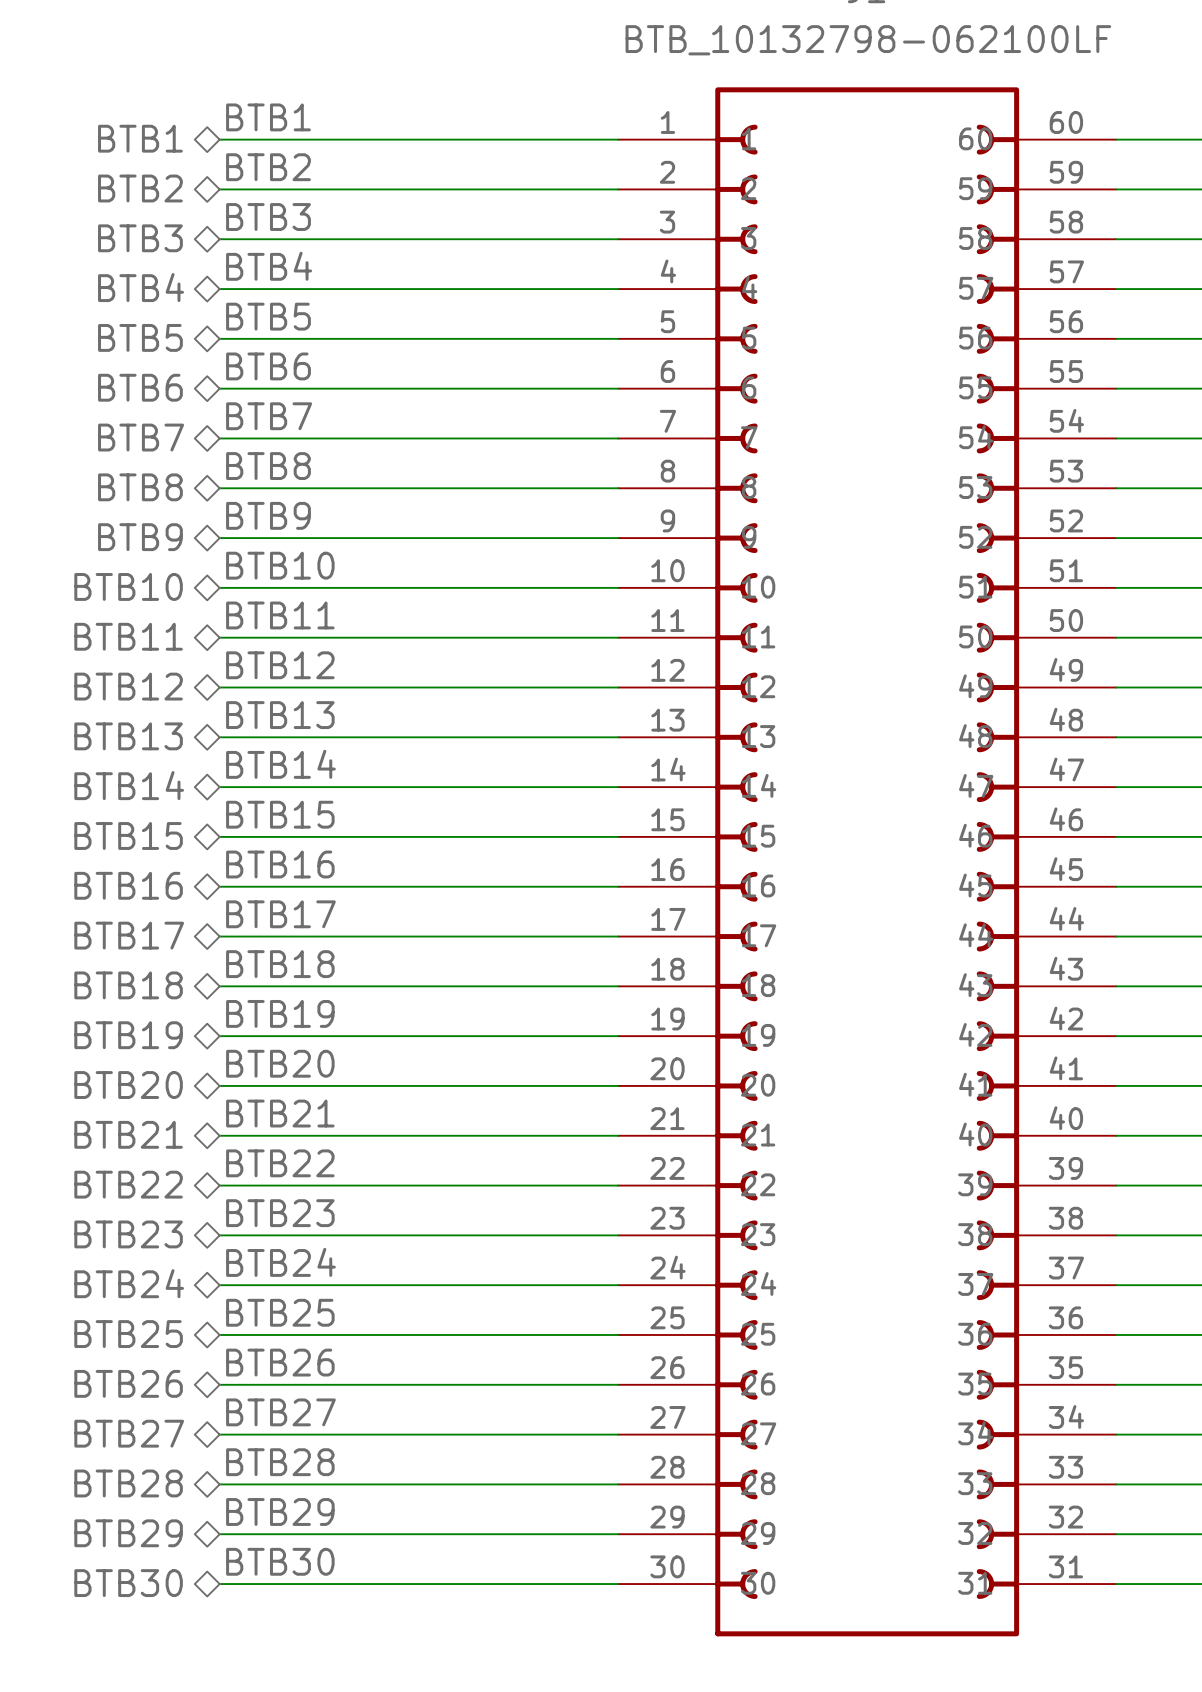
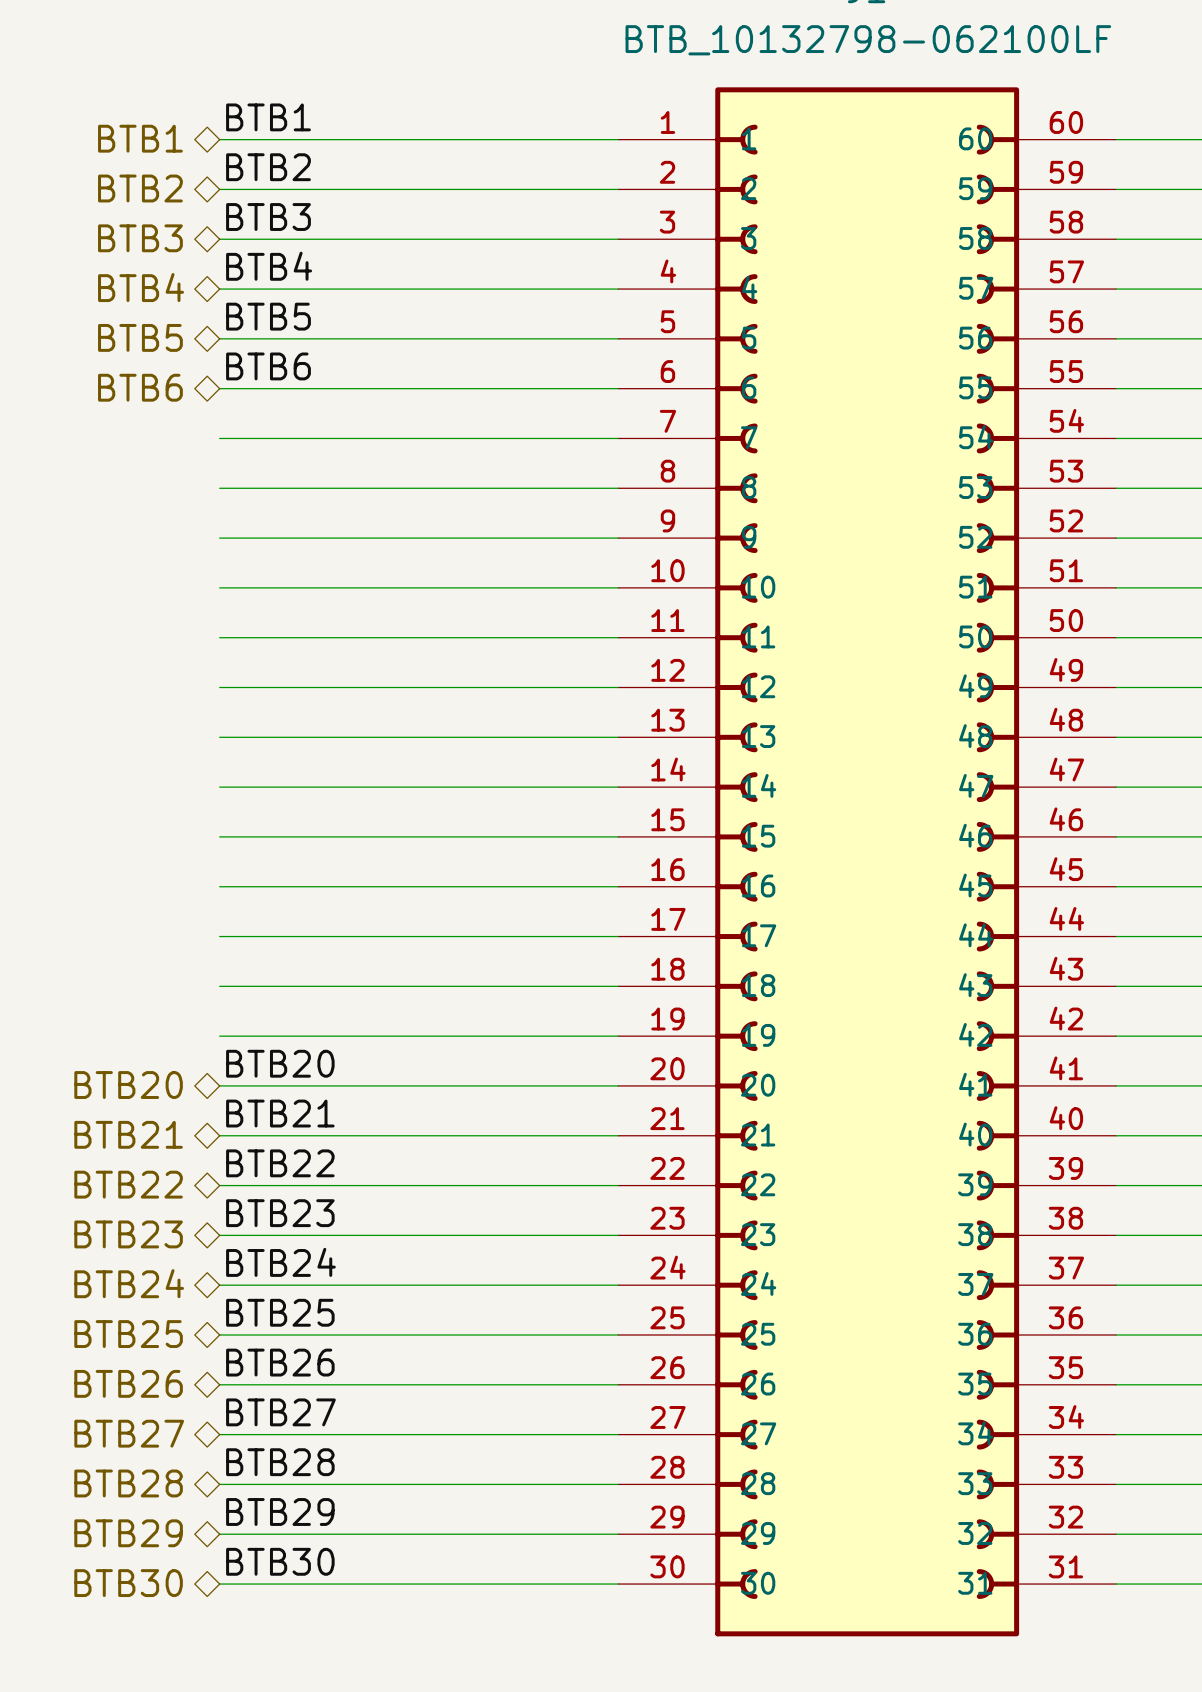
label: BTB7 (269, 416) -> none
hierarchical label: BTB7 (141, 437) -> none
label: BTB8 (268, 466) -> none
hierarchical label: BTB8 (140, 487) -> none
label: BTB9 (268, 515) -> none
hierarchical label: BTB9 (140, 537) -> none
label: BTB10 (280, 565) -> none
hierarchical label: BTB10 (128, 586) -> none
label: BTB11 (280, 615) -> none
hierarchical label: BTB11 (128, 636) -> none
label: BTB12 (280, 665) -> none
hierarchical label: BTB12 (128, 686) -> none
label: BTB13 (280, 715) -> none
hierarchical label: BTB13 (128, 736) -> none
label: BTB14 (280, 764) -> none
hierarchical label: BTB14 (129, 785) -> none
label: BTB15 (280, 814) -> none
hierarchical label: BTB15 (128, 835) -> none
label: BTB16 (280, 864) -> none
hierarchical label: BTB16 (128, 885) -> none
label: BTB17 (280, 914) -> none
hierarchical label: BTB17 (129, 935) -> none
label: BTB18 (280, 964) -> none
hierarchical label: BTB18 (128, 985) -> none
label: BTB19 (280, 1013) -> none
hierarchical label: BTB19 (128, 1035) -> none

